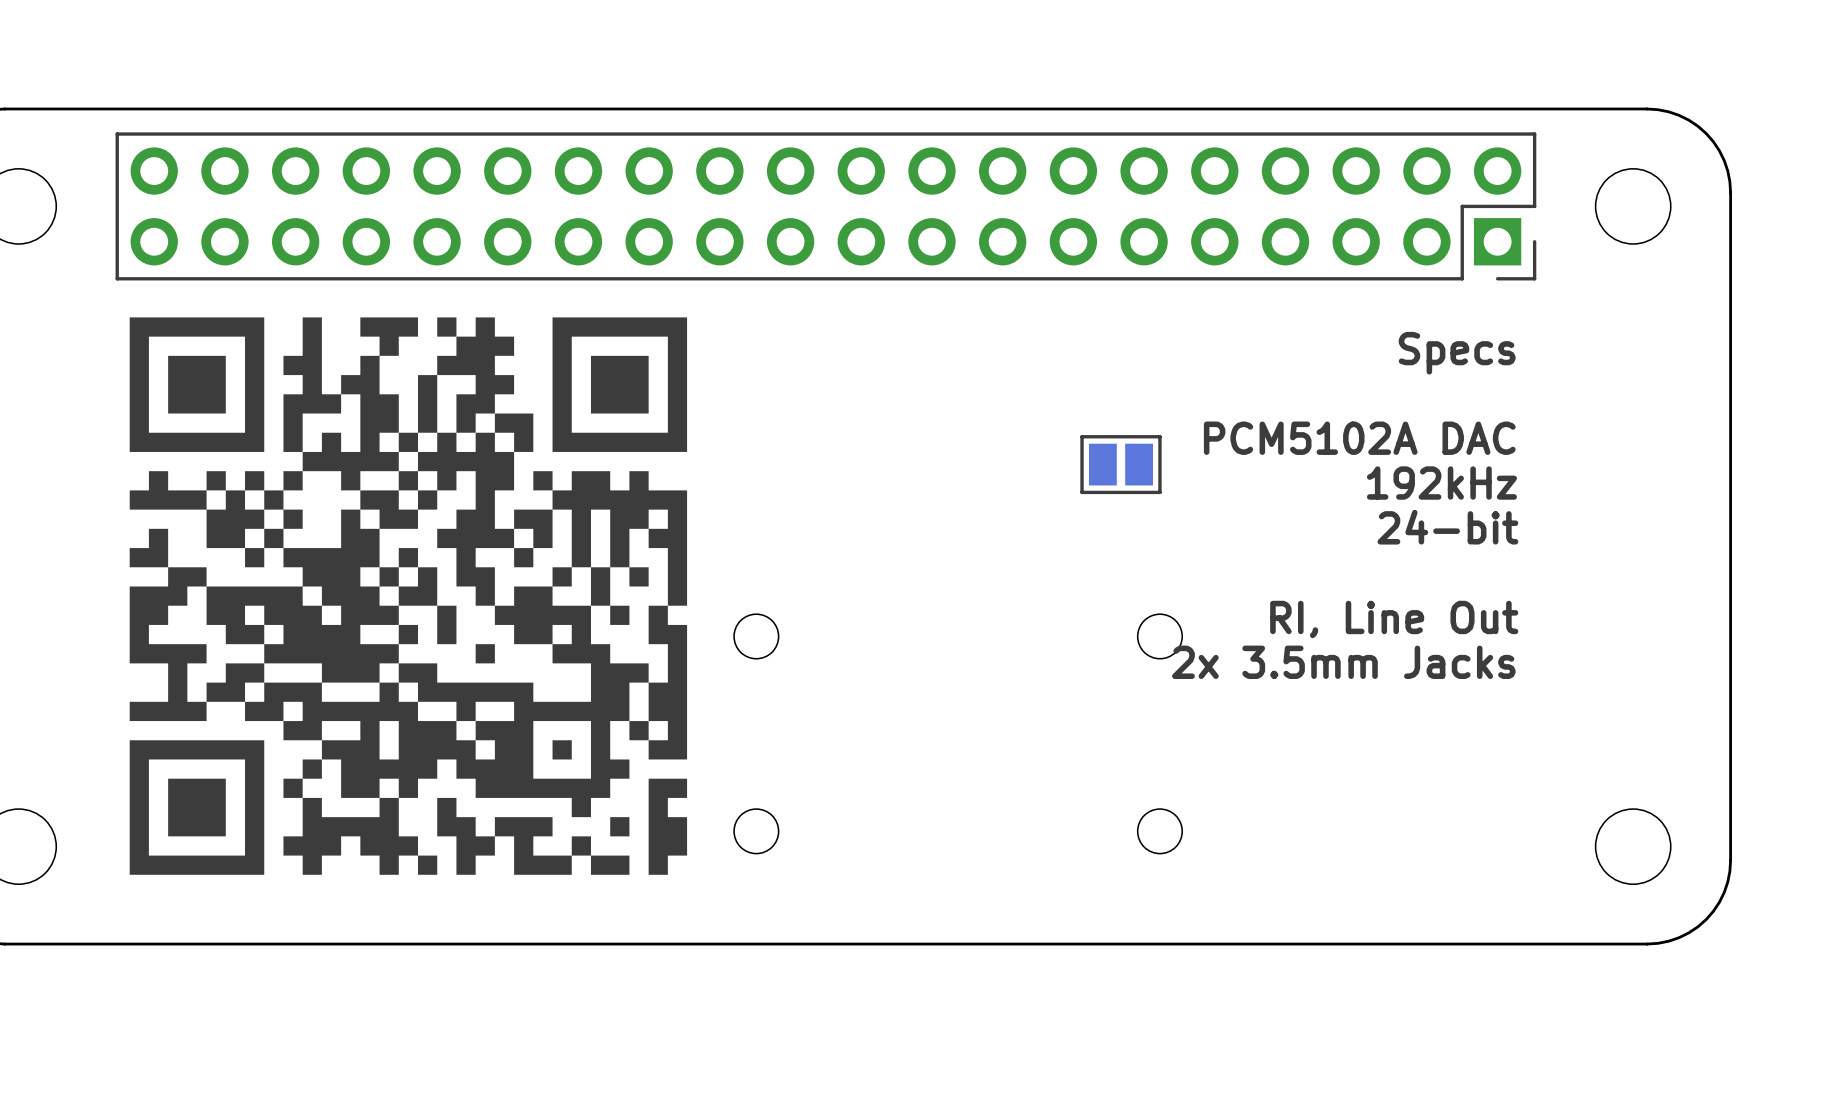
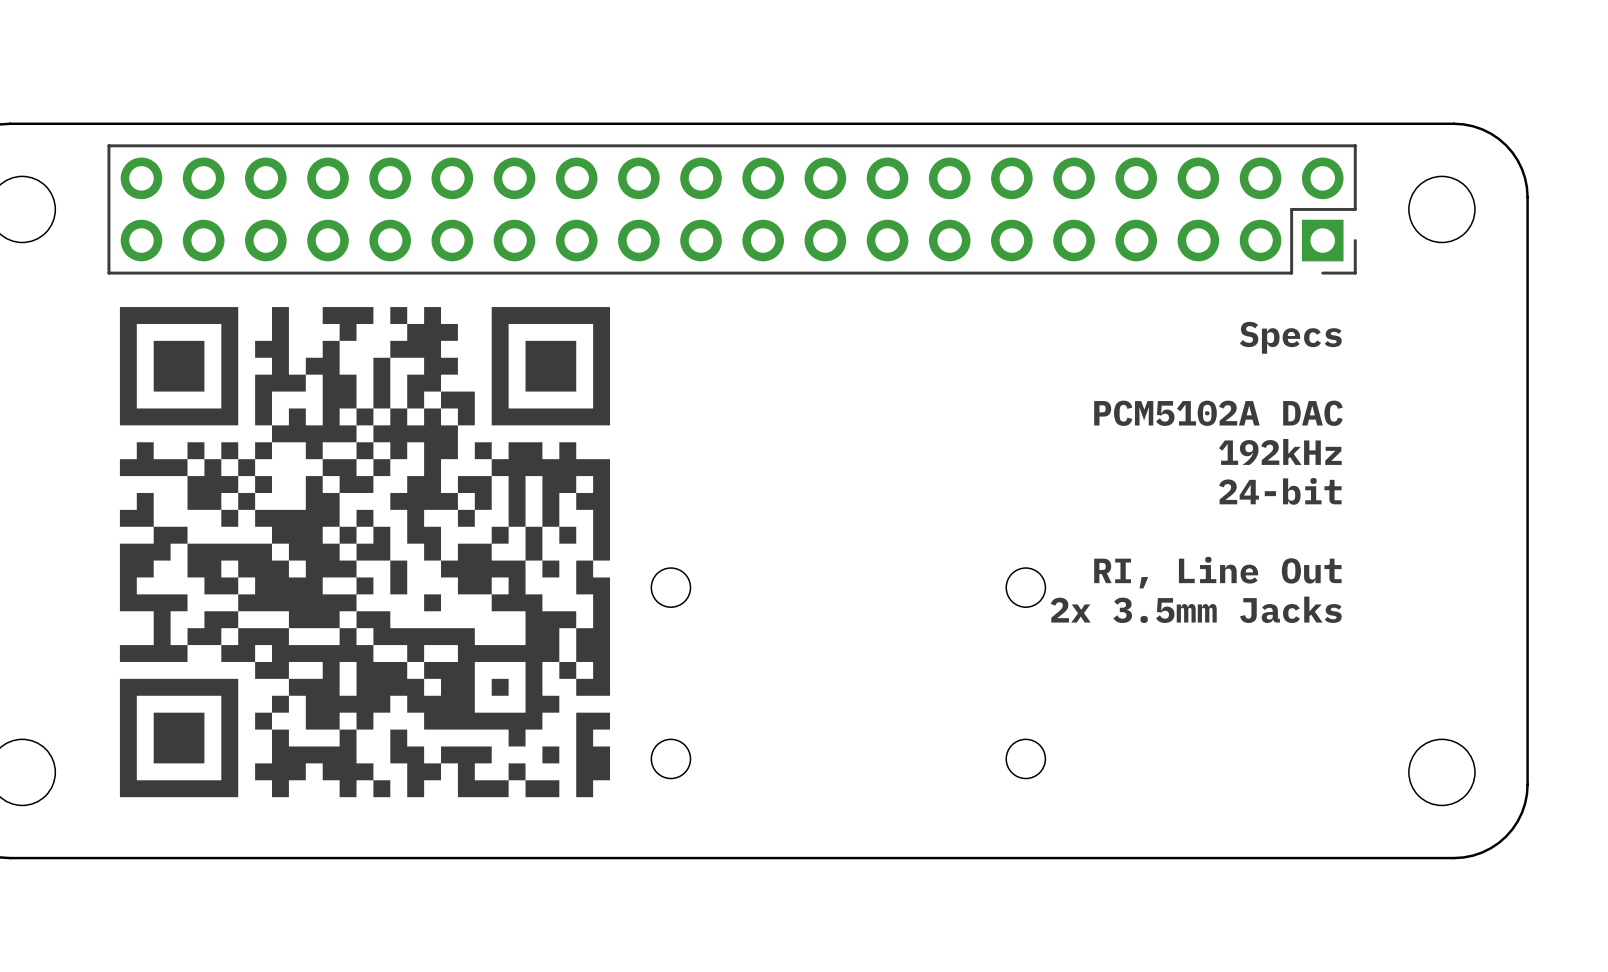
part: (1120, 464) -> none

